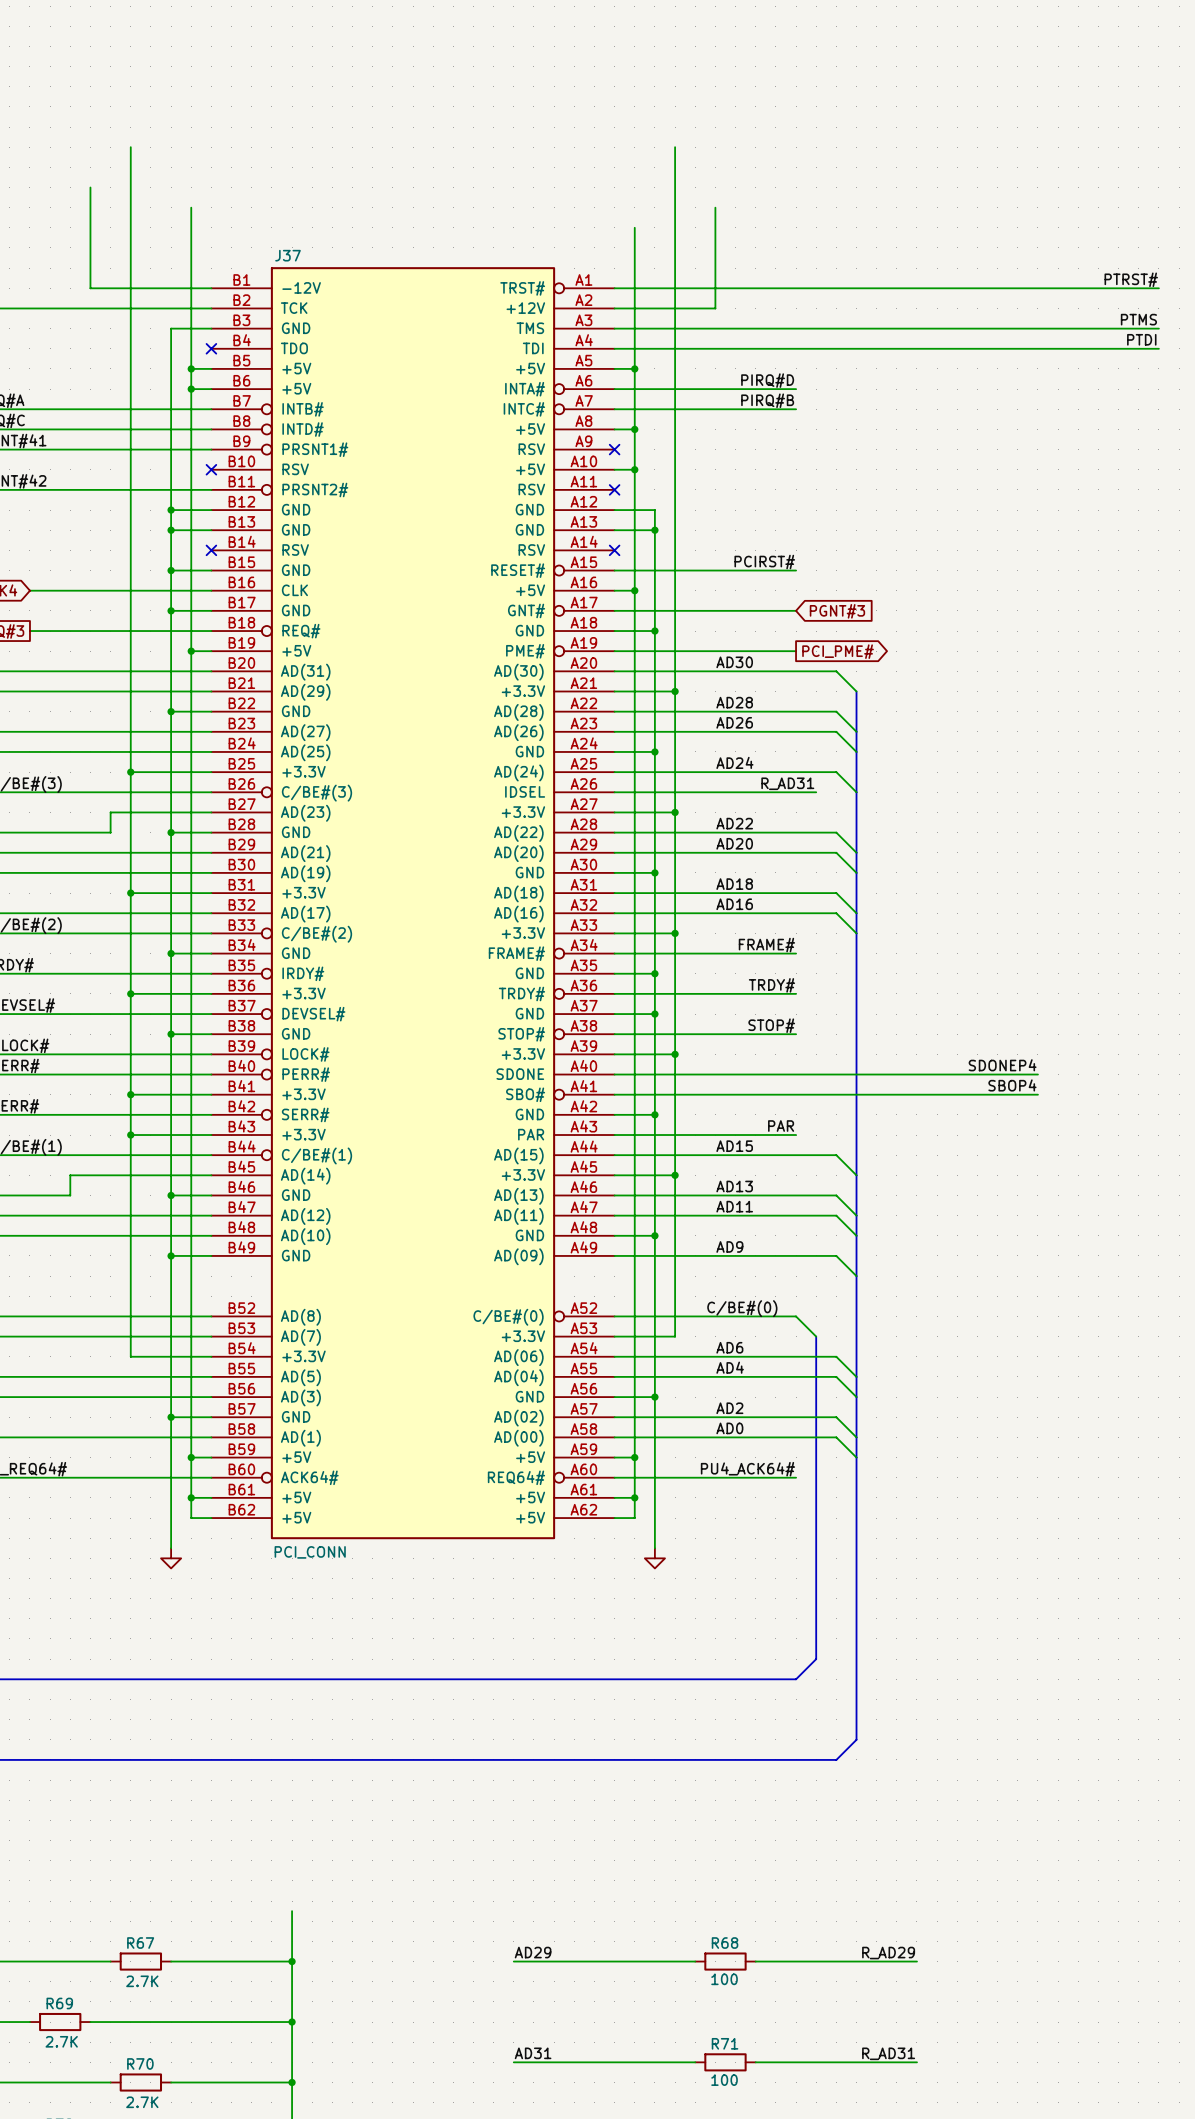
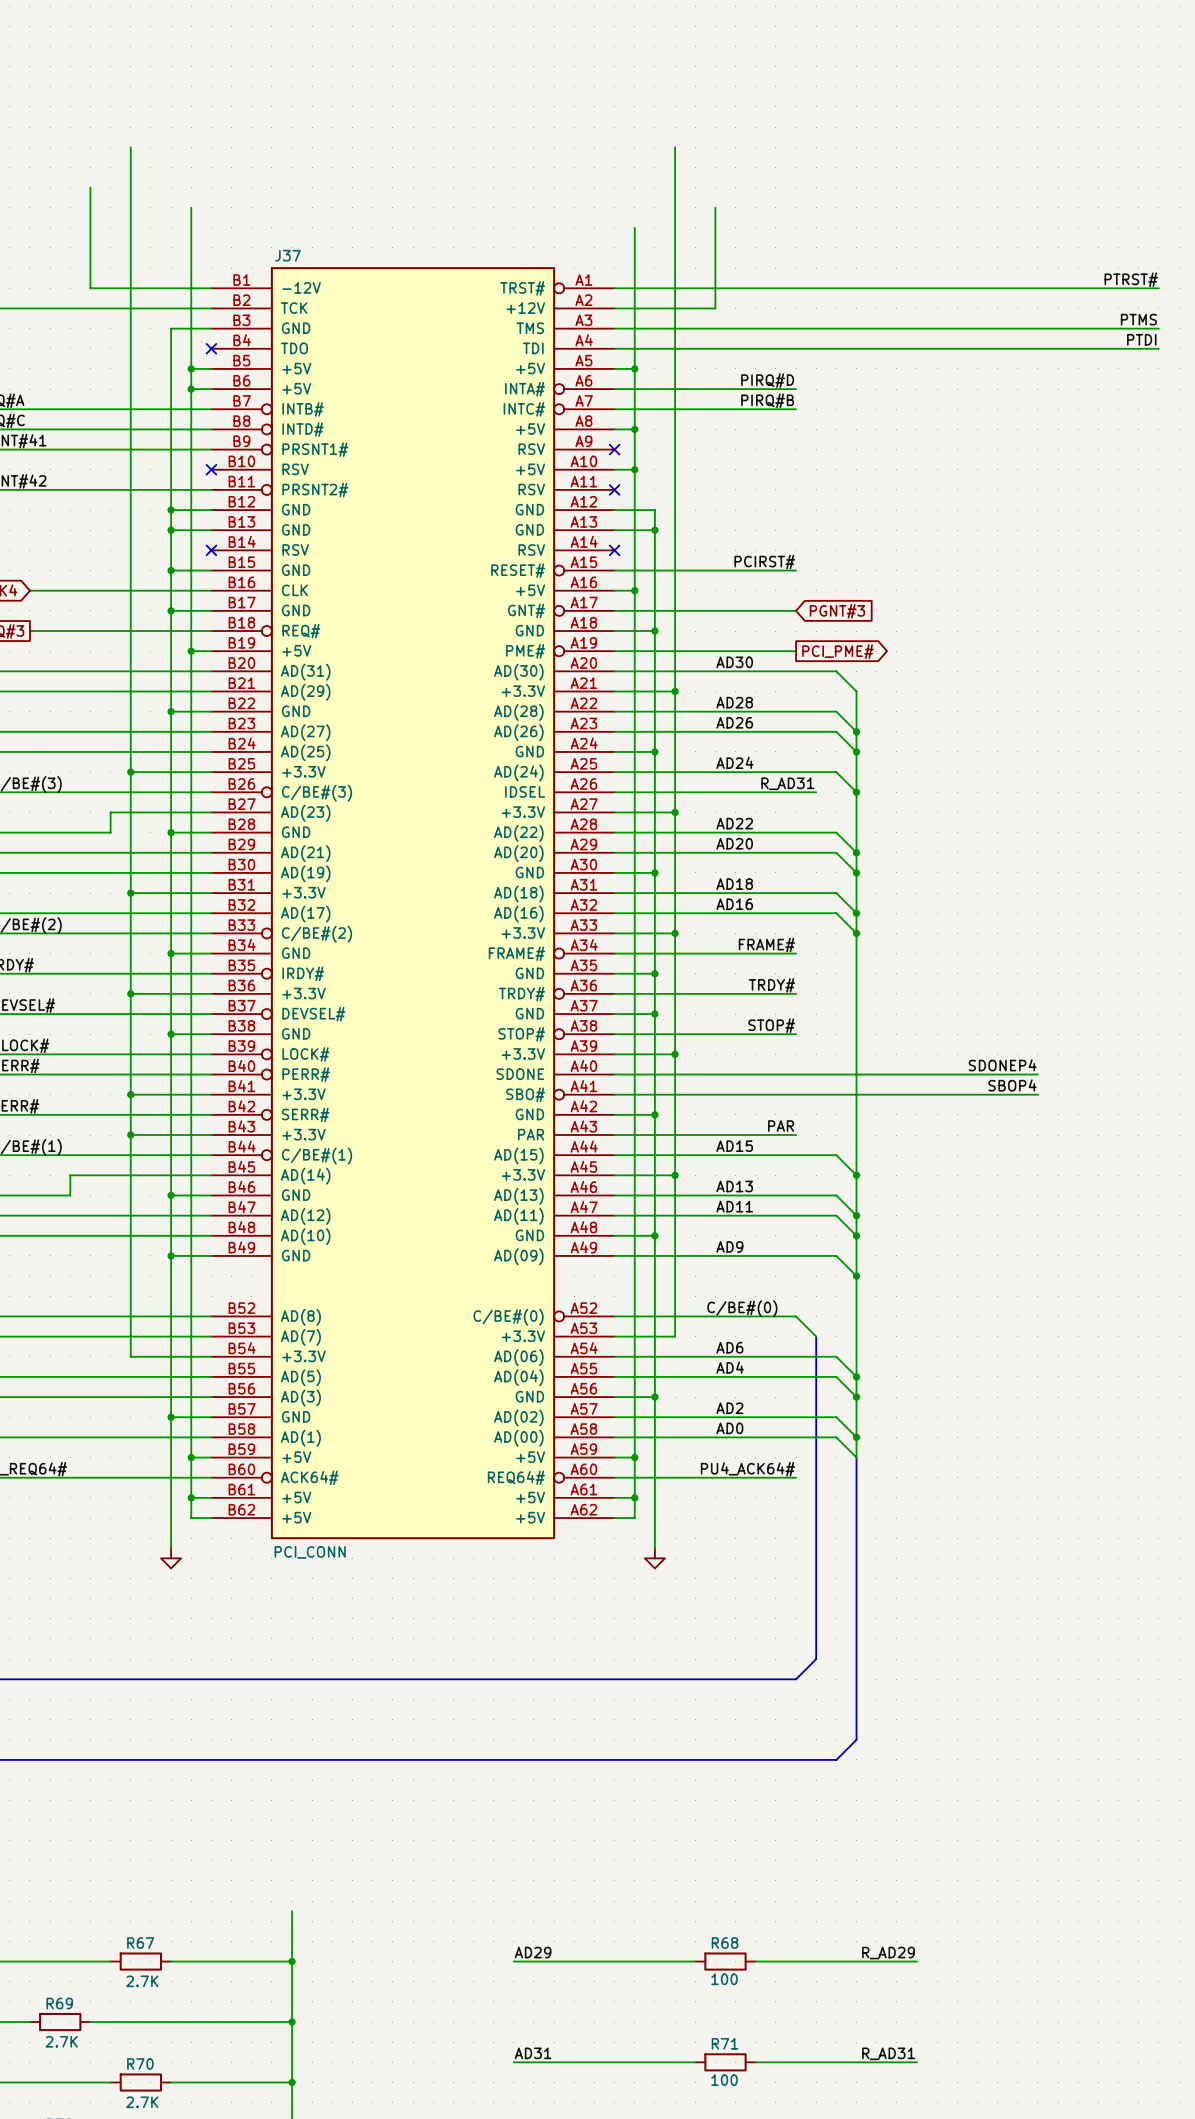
bus: (856, 691) (856, 1457) -> none
junction: none -> (856, 731)
junction: none -> (856, 751)
junction: none -> (856, 792)
junction: none -> (856, 852)
junction: none -> (856, 872)
junction: none -> (856, 913)
junction: none -> (856, 933)
junction: none -> (856, 1175)
junction: none -> (856, 1215)
junction: none -> (856, 1235)
junction: none -> (856, 1276)
junction: none -> (856, 1376)
junction: none -> (856, 1397)
junction: none -> (856, 1437)

